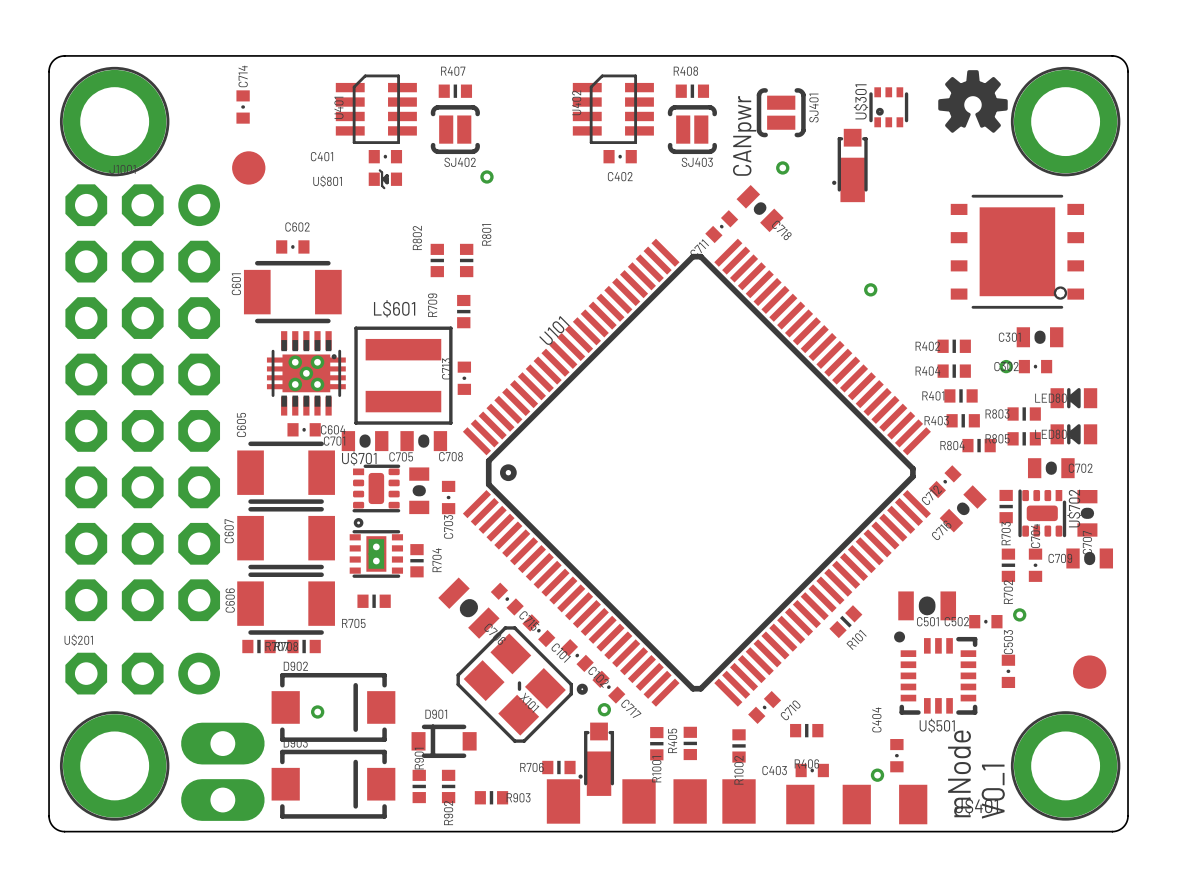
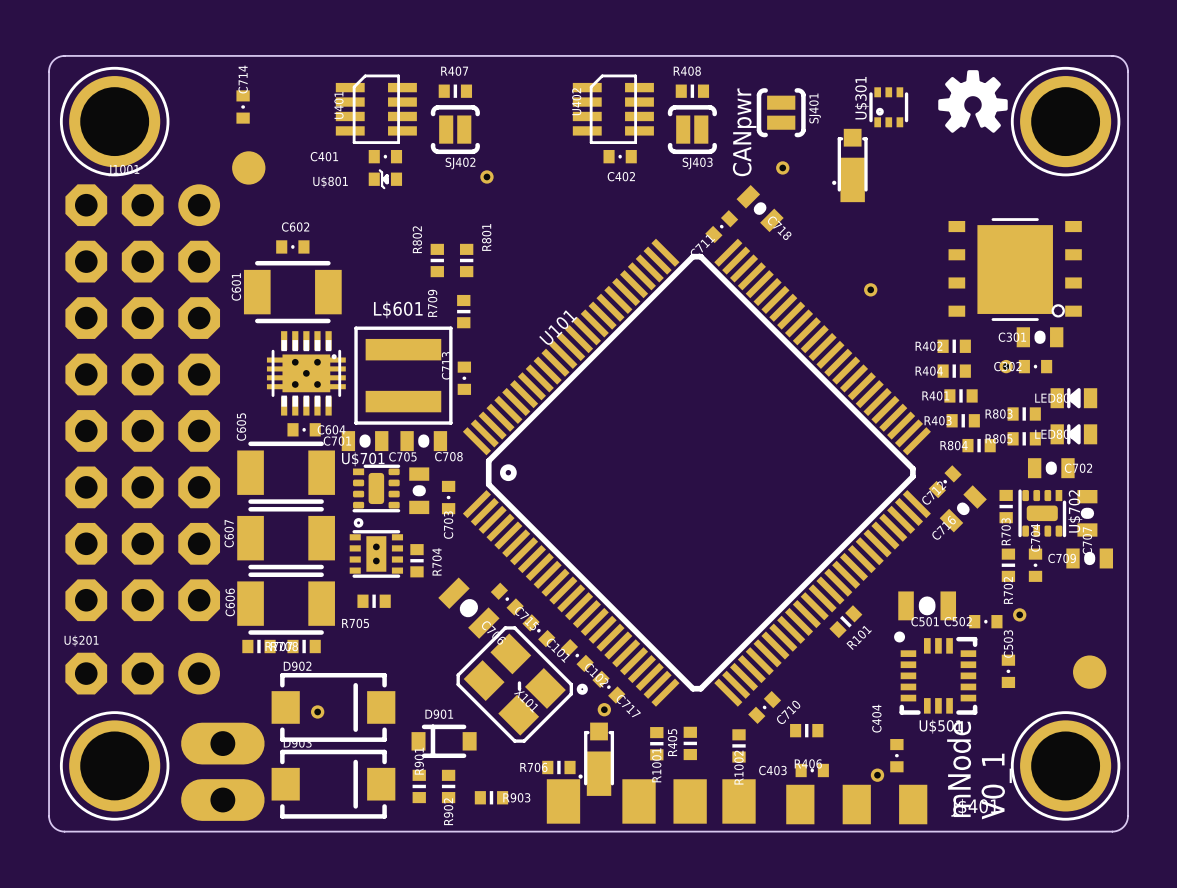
part footprint: [59, 66, 170, 177] -> [59, 66, 170, 177]
part footprint: [1010, 66, 1121, 177] -> [1010, 66, 1121, 177]
part footprint: [950, 194, 1085, 309] -> [948, 218, 1082, 321]
part footprint: [59, 711, 170, 821] -> [59, 711, 170, 821]
part footprint: [1010, 711, 1121, 821] -> [1010, 711, 1121, 821]

